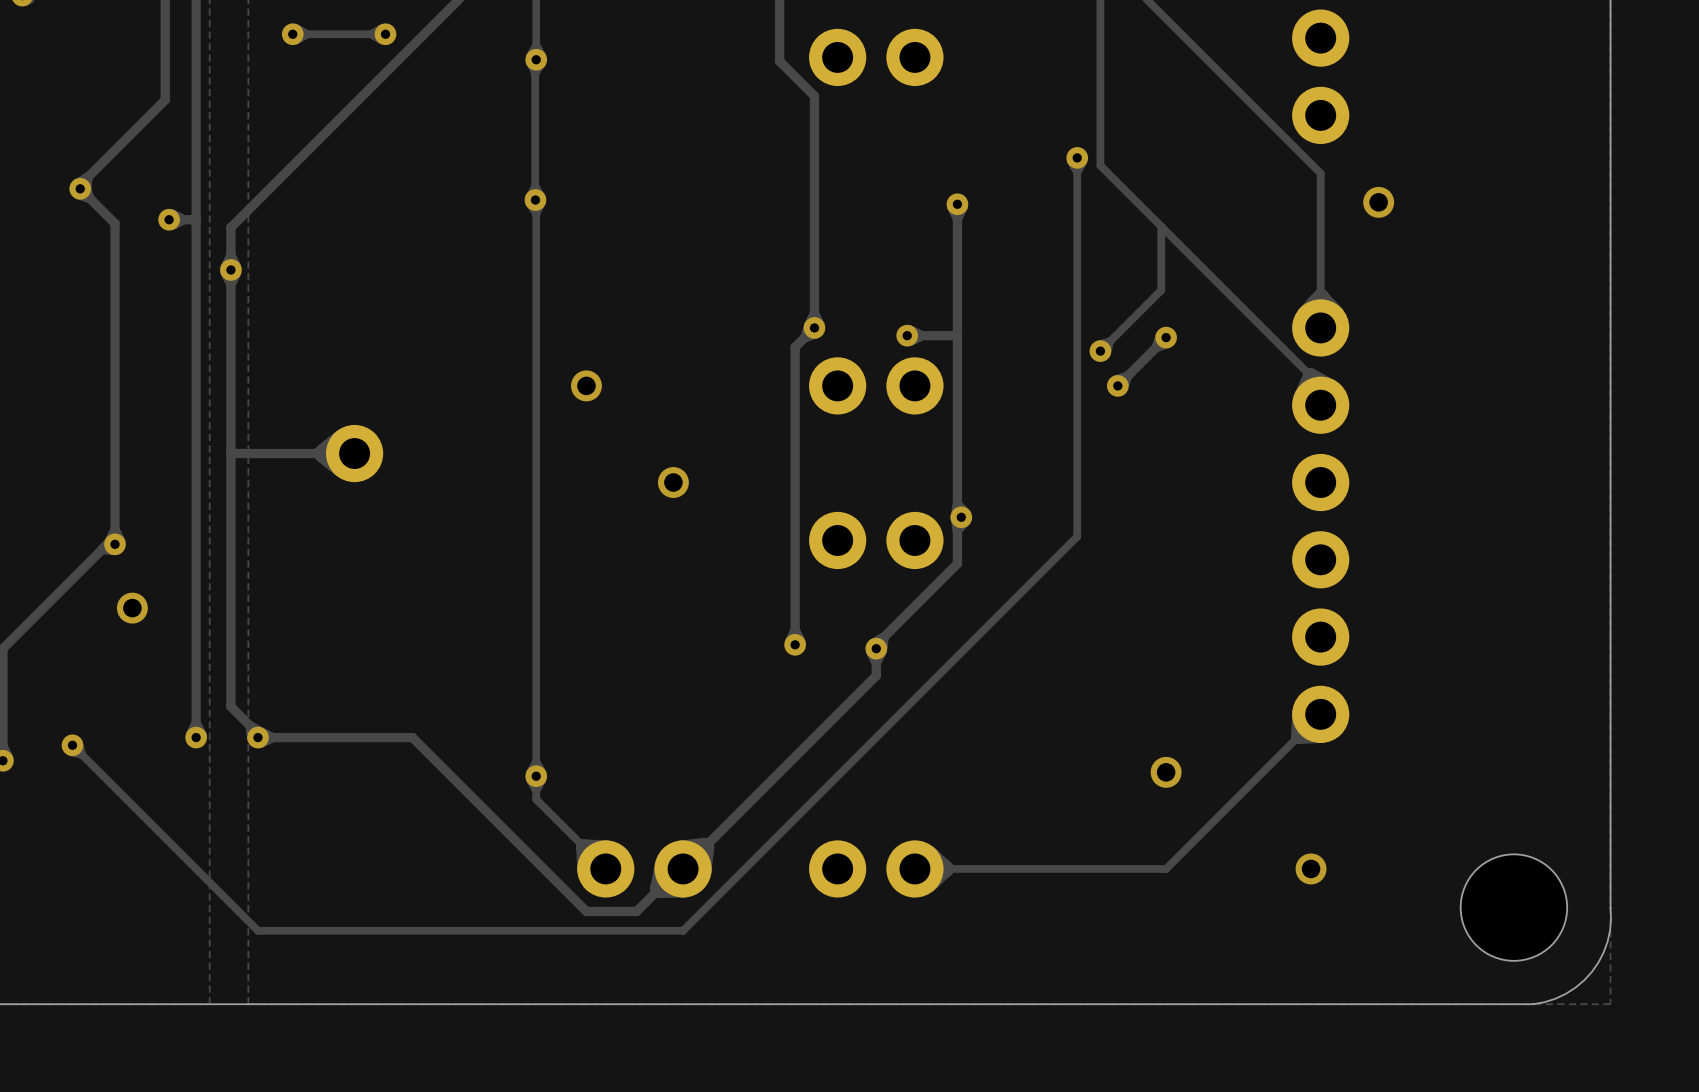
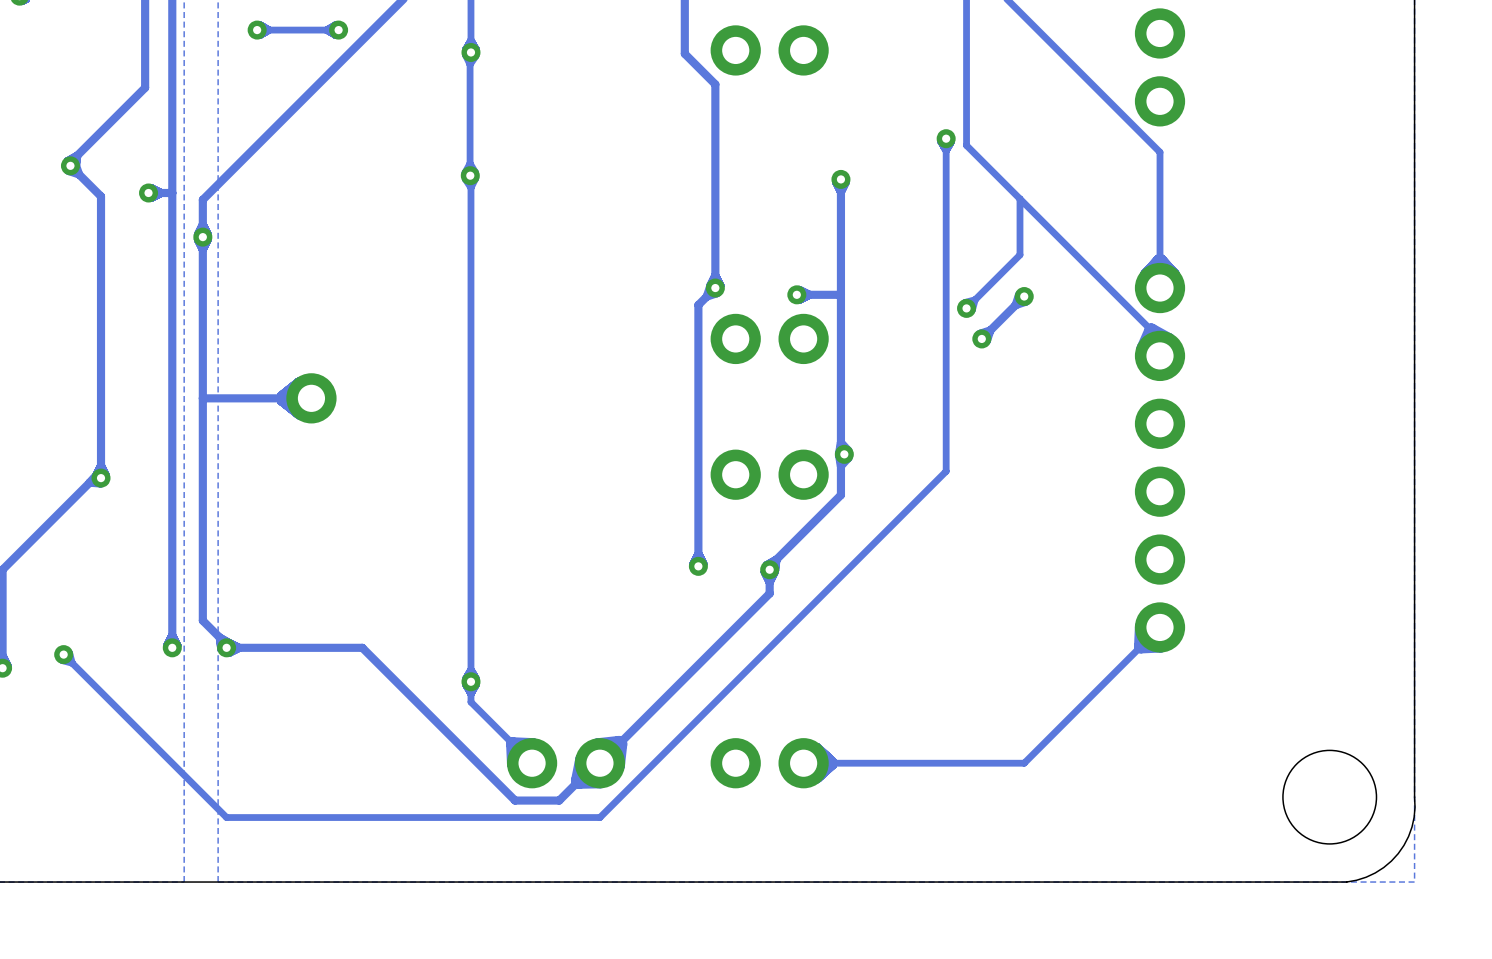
via: (1378, 202) -> none
via: (586, 385) -> none
via: (673, 482) -> none
via: (132, 608) -> none
via: (1166, 772) -> none
via: (1311, 868) -> none

